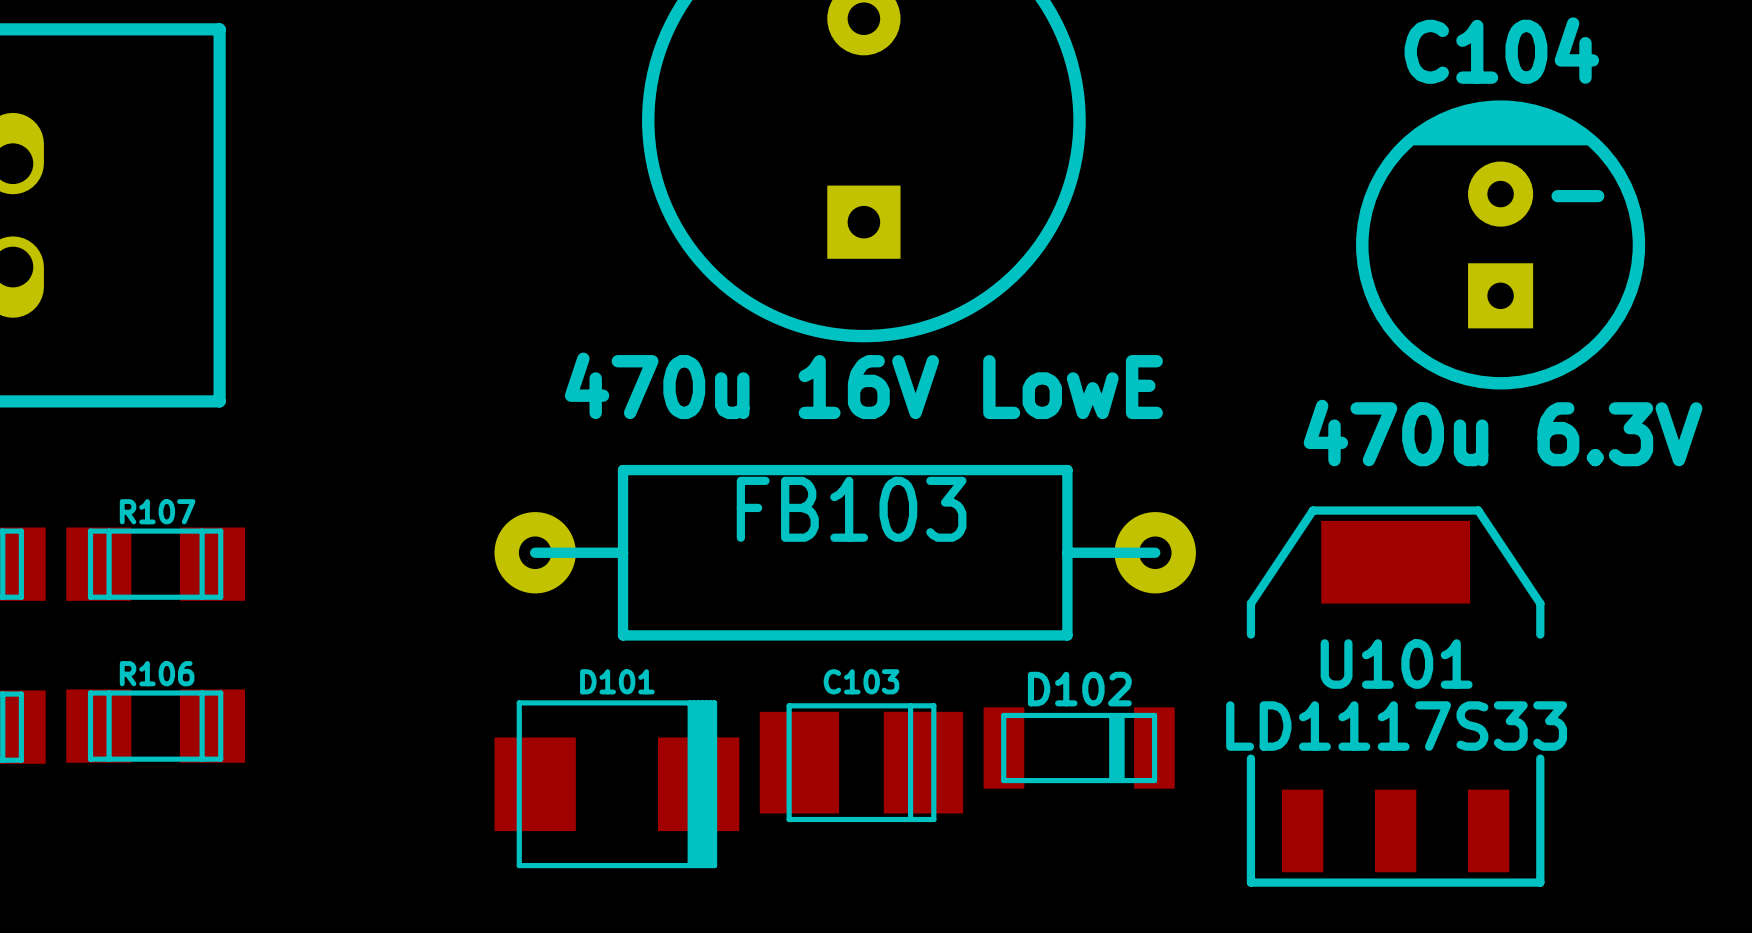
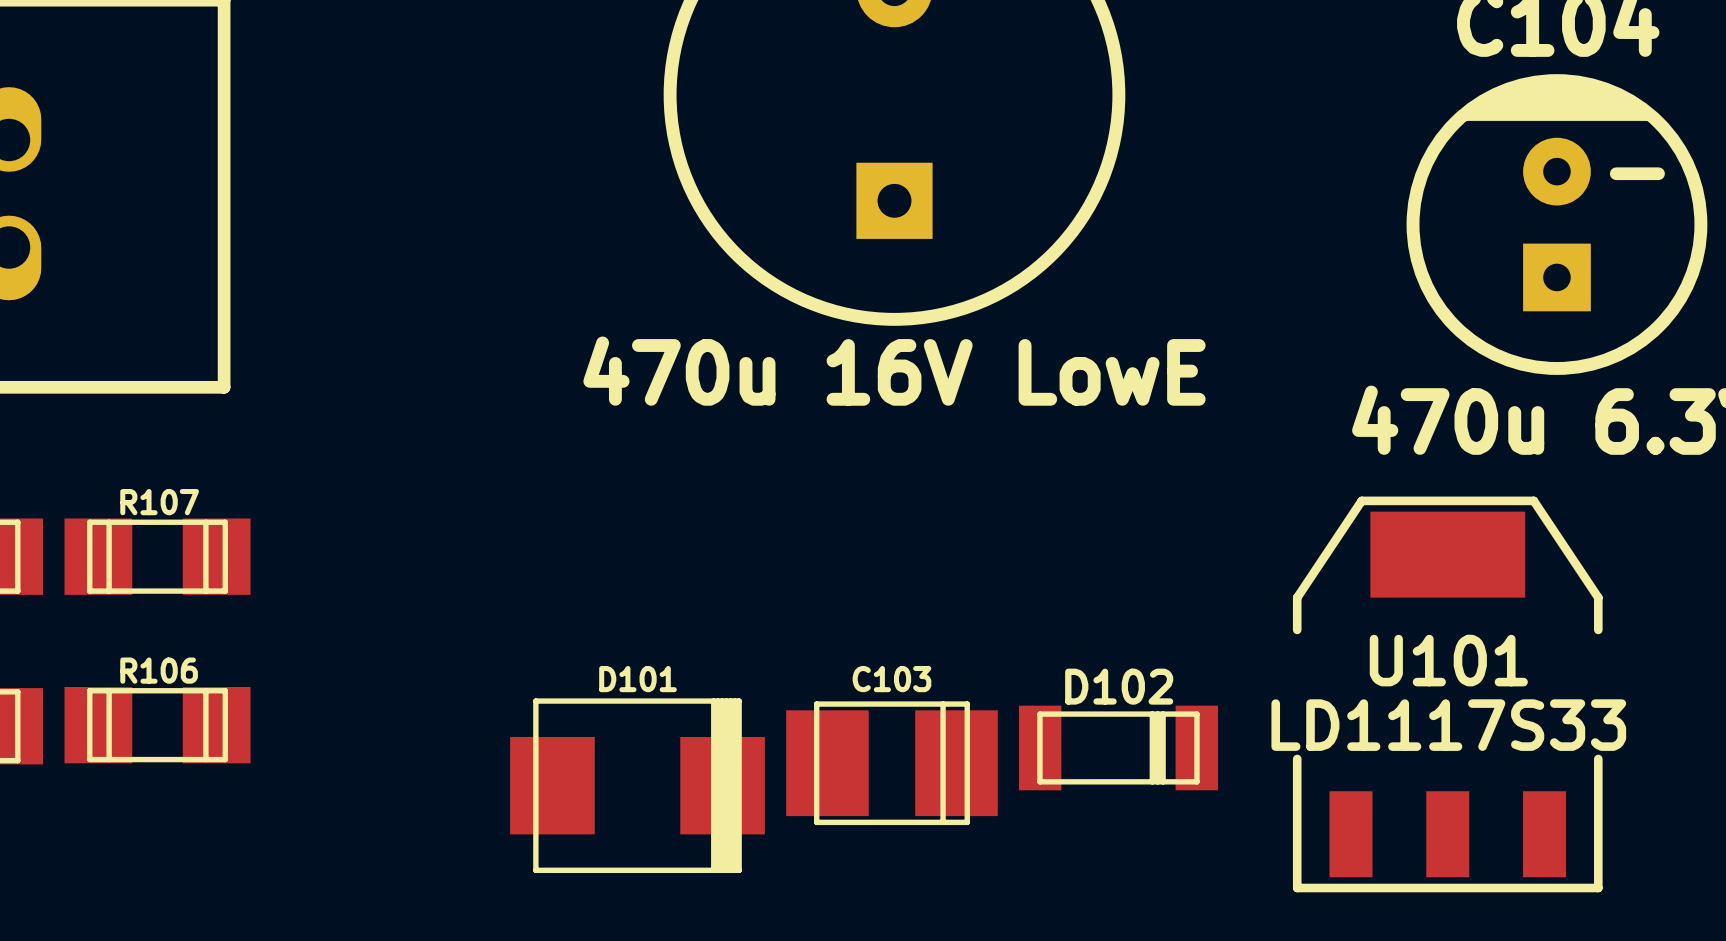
FB103: (845, 552) -> none

